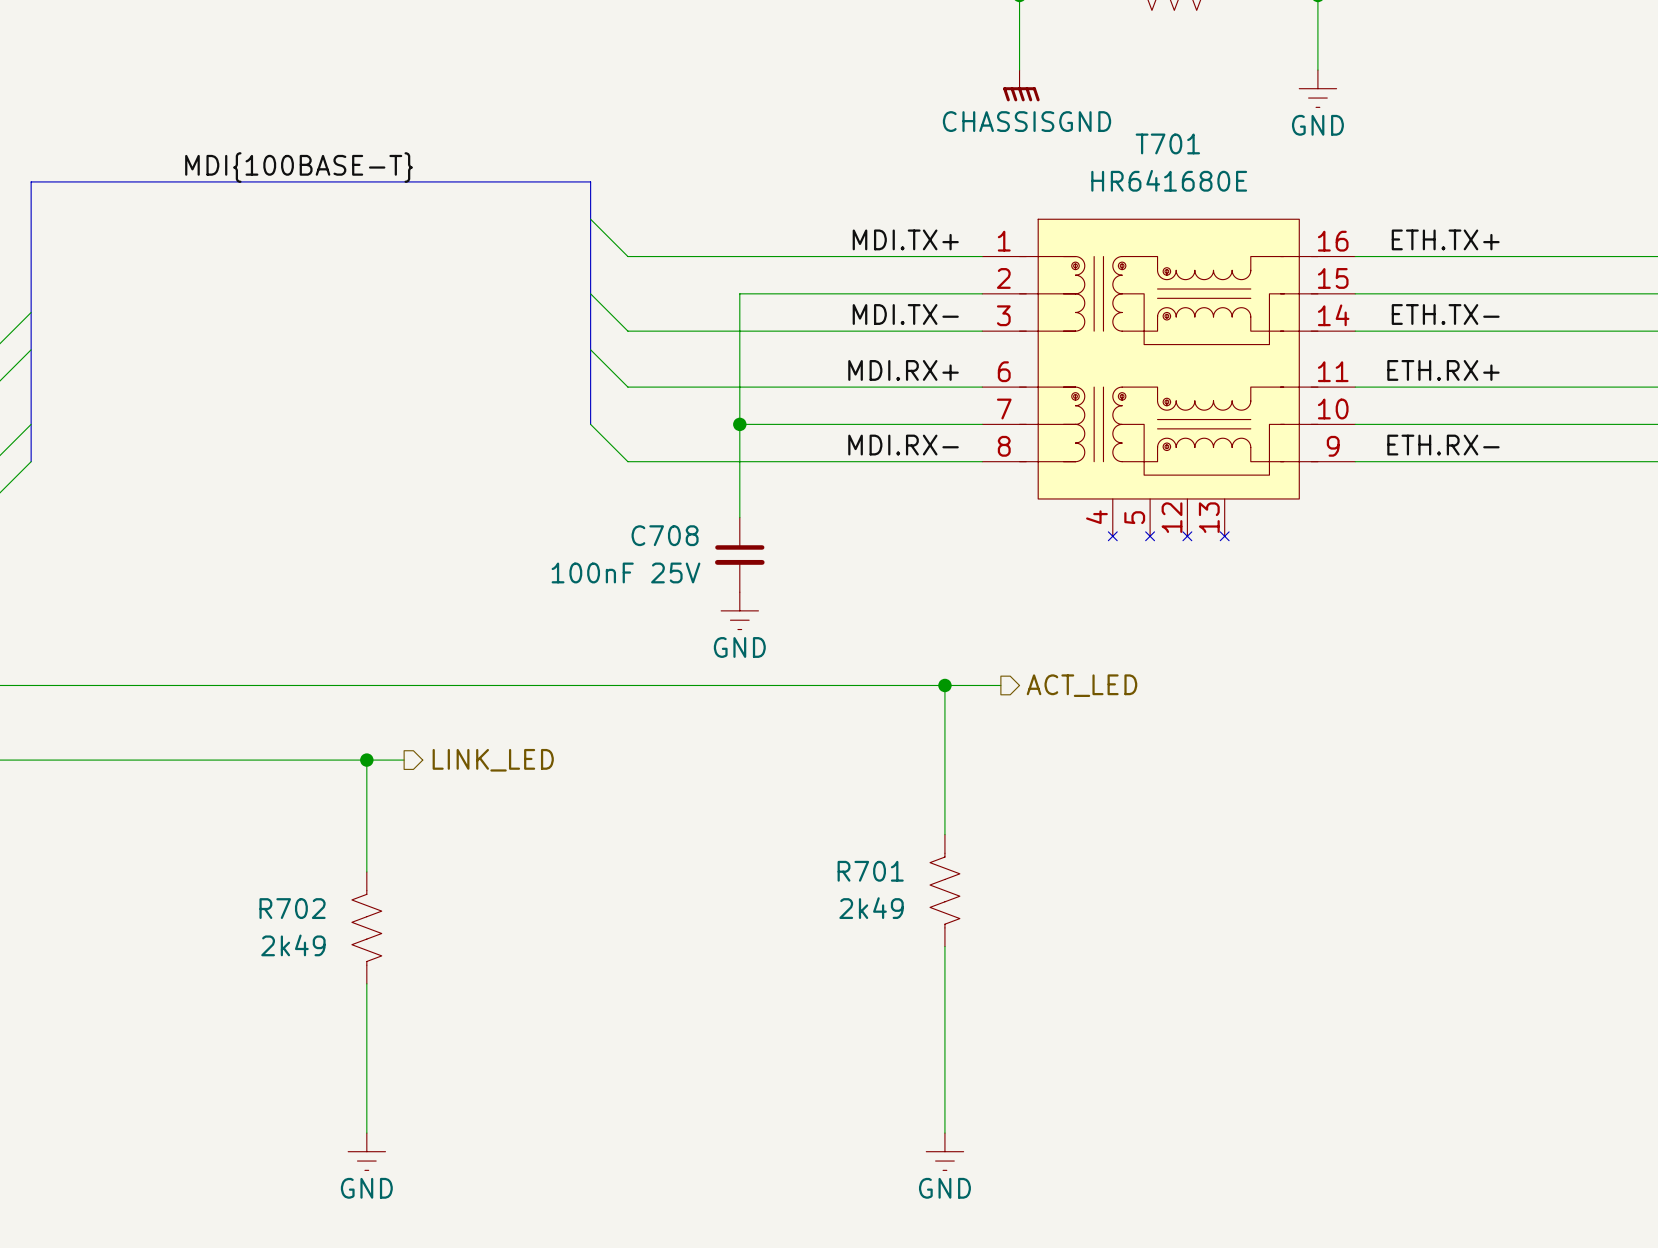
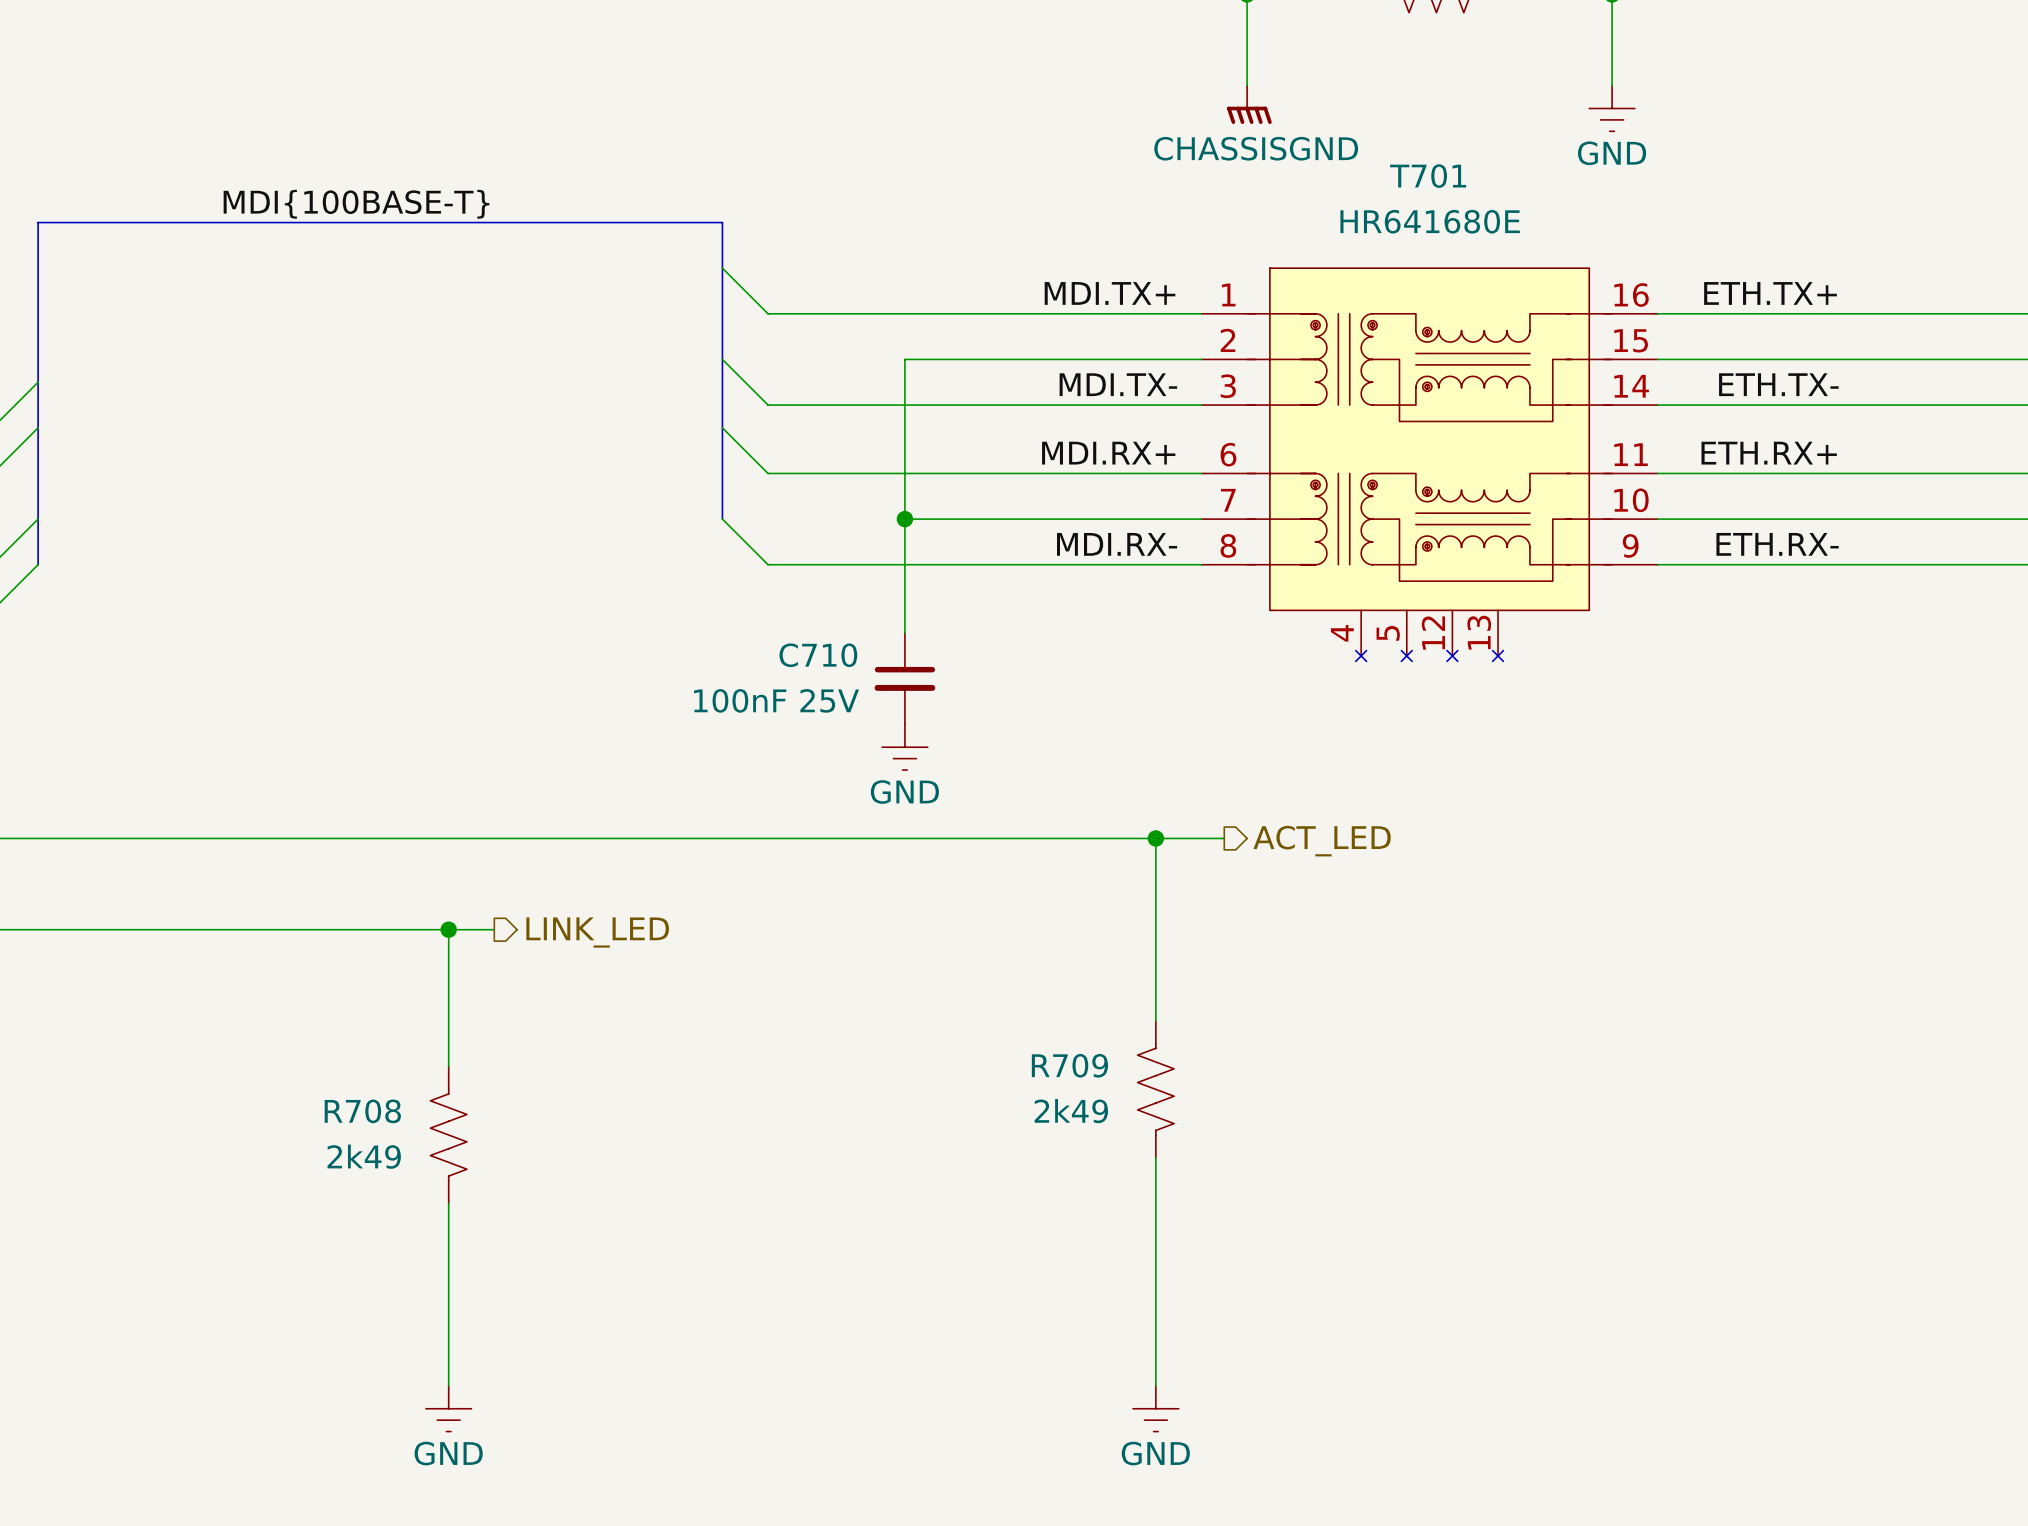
C708 name: C708 (665, 535) -> C710 (818, 655)
R701 name: R701 (870, 871) -> R709 (1069, 1065)
R702 name: R702 (292, 908) -> R708 (362, 1111)

